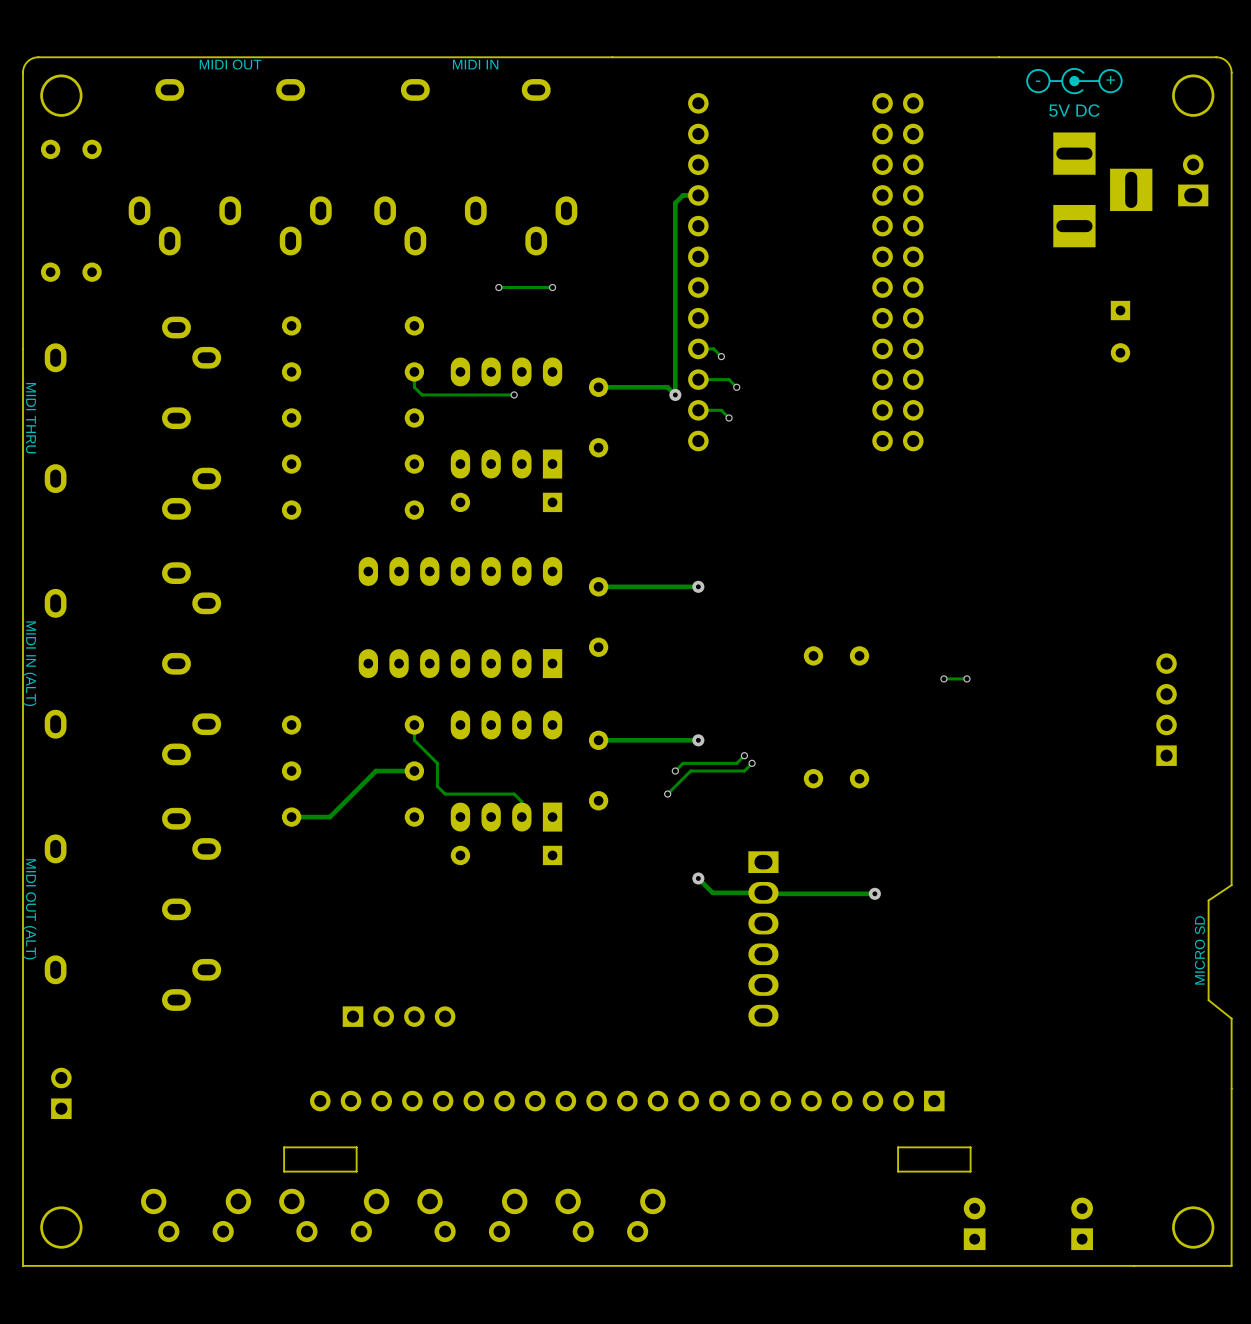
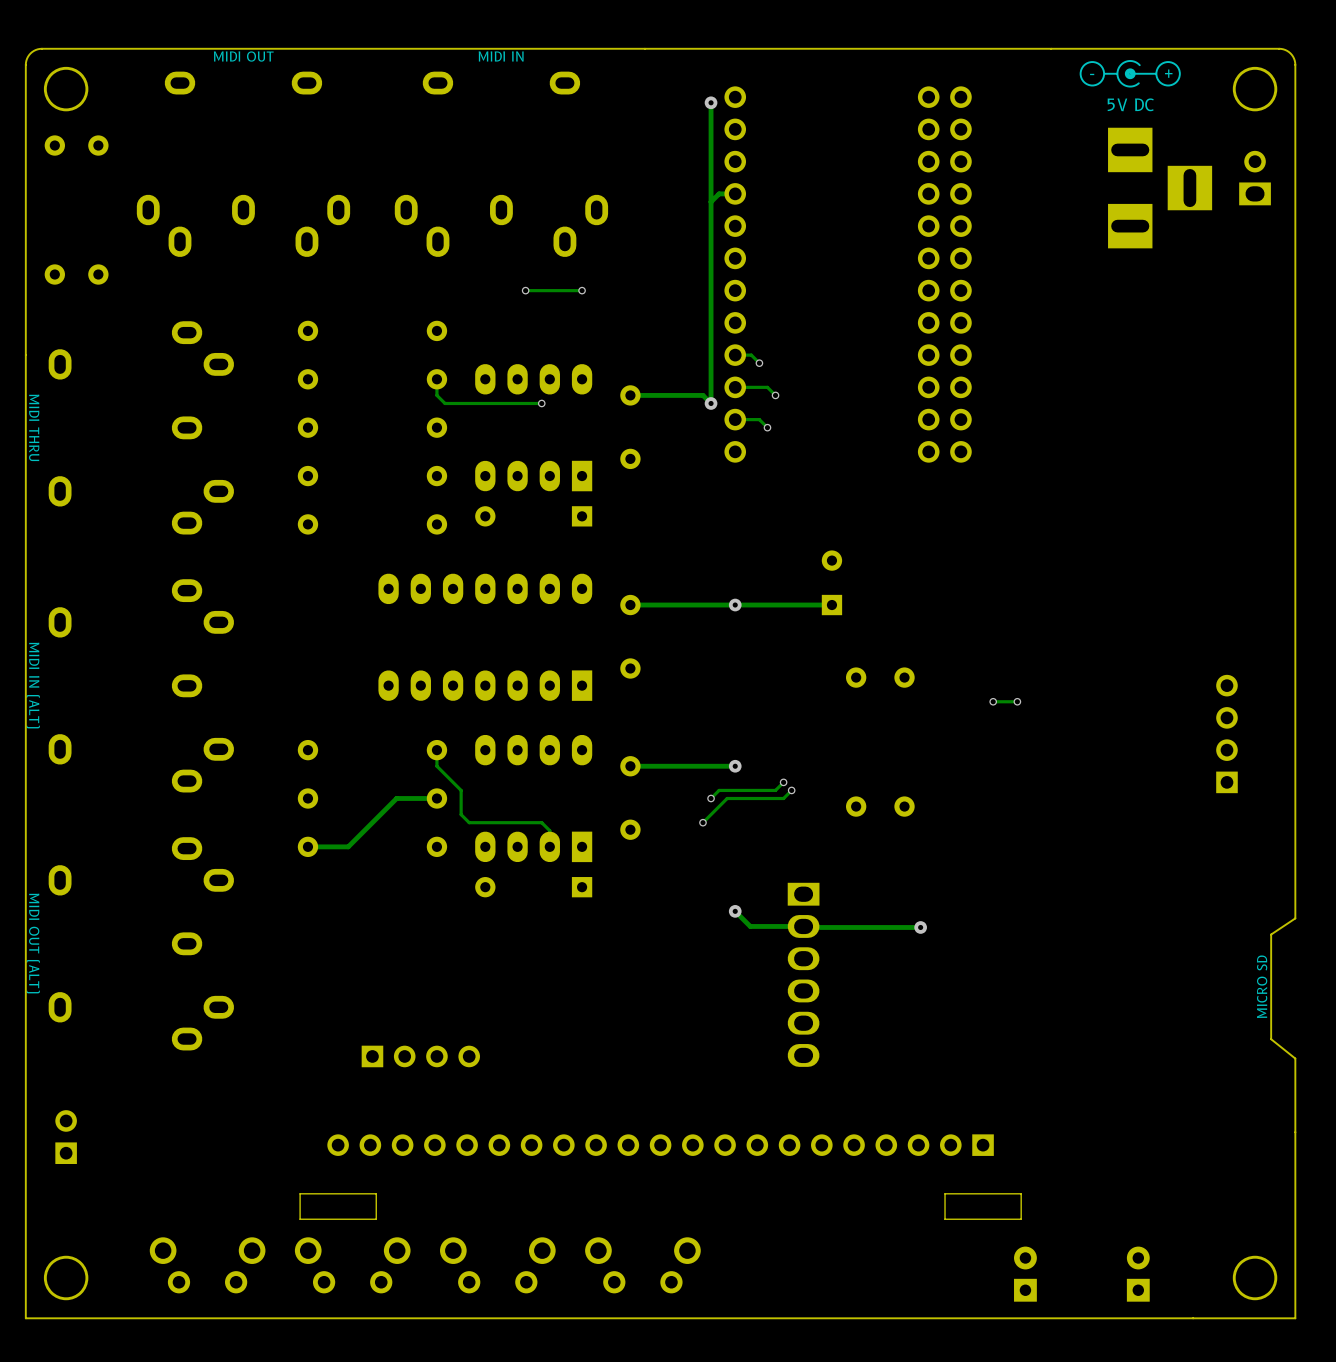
track: none -> (711, 102) (711, 201)
via: none -> (711, 102)
part: (1120, 331) -> none
part: none -> (831, 582)
track: none -> (831, 605) (735, 605)

